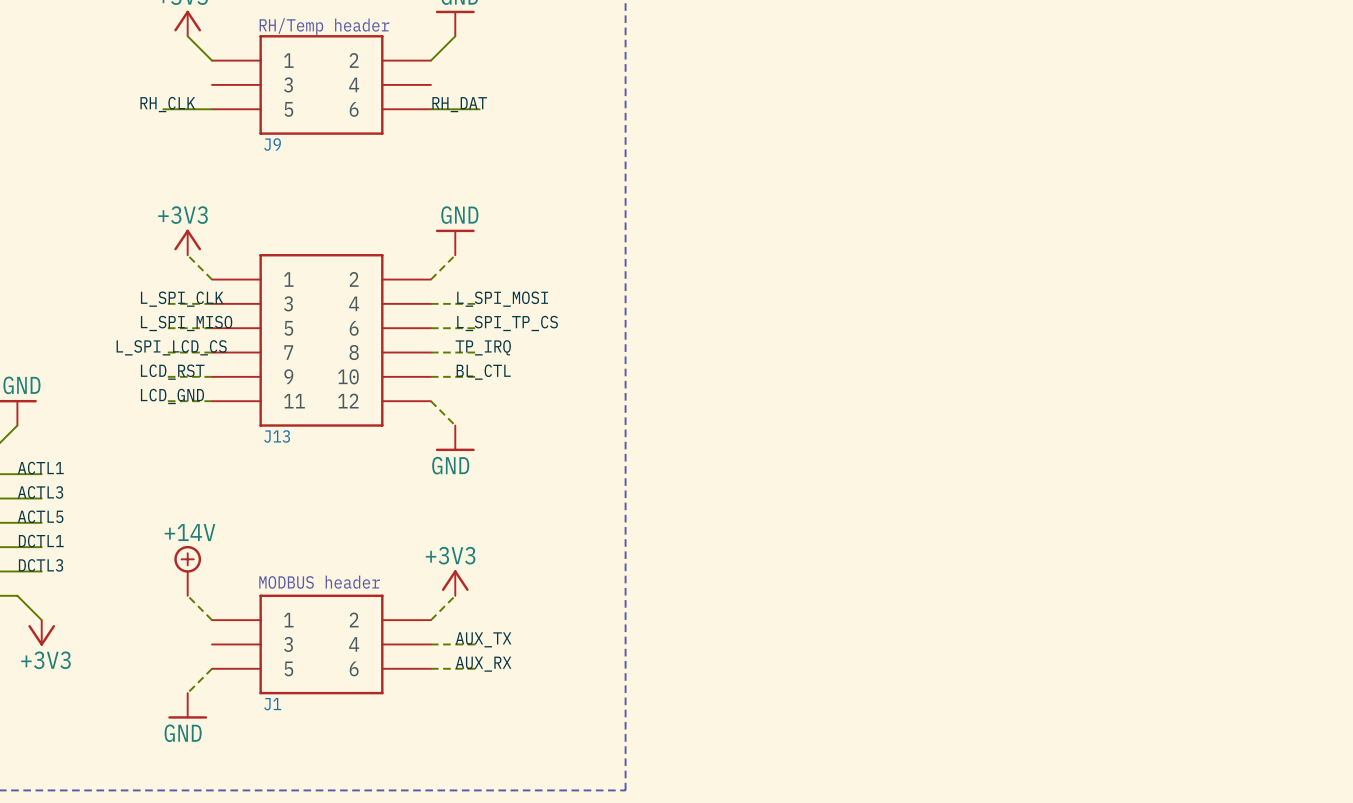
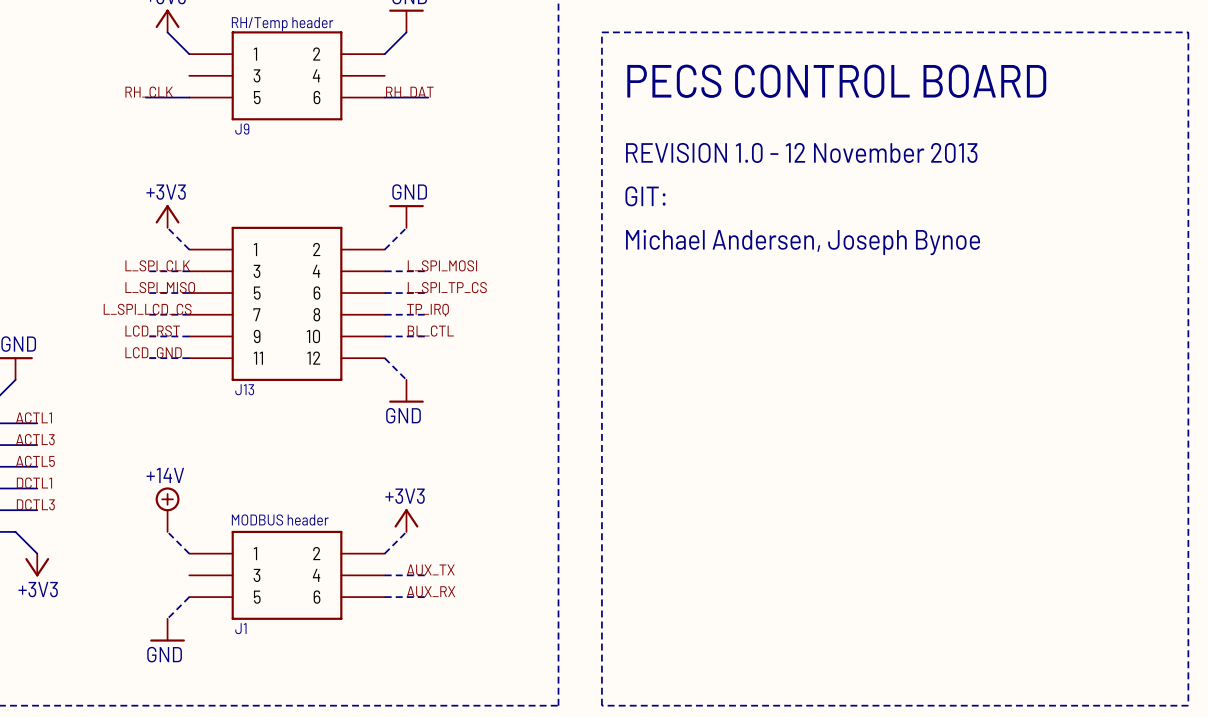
line: none -> (601, 32) (1188, 32) (1188, 705) (601, 705) (601, 32)
text: none -> PECS CONTROL BOARD (836, 81)
text: none -> REVISION 1.0 - 12 November 2013 (801, 152)
text: none -> GIT: (645, 196)
text: none -> Michael Andersen, Joseph Bynoe (803, 242)

